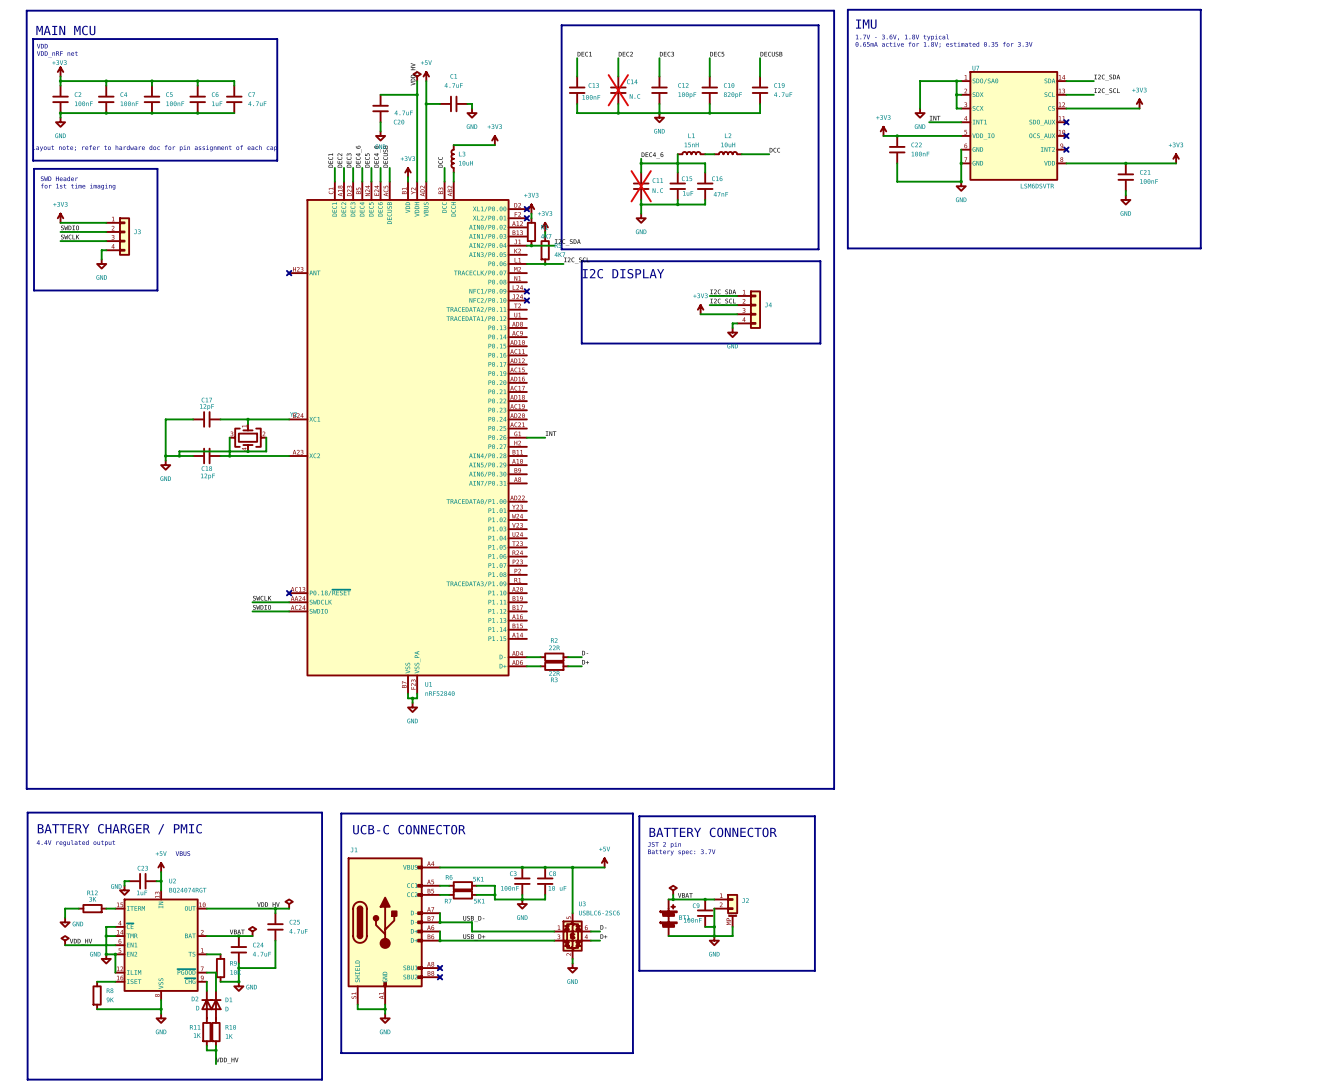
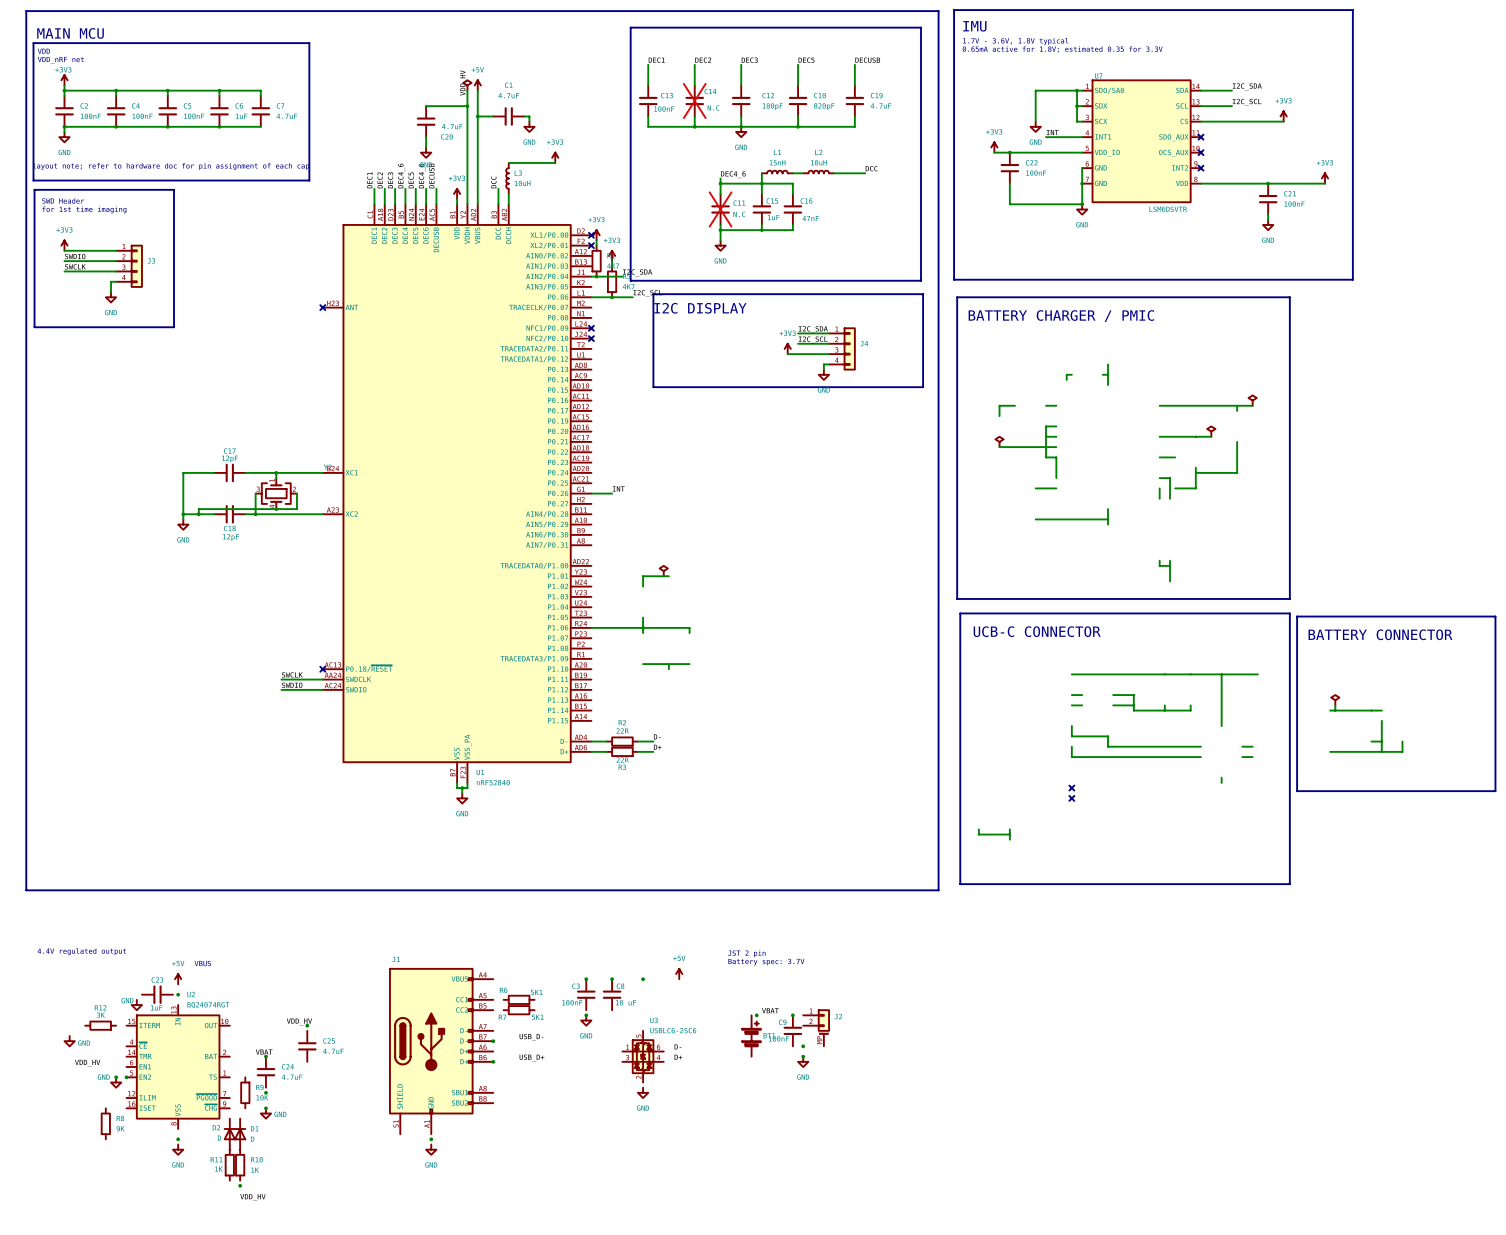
line: none -> (957, 297) (1289, 297) (1289, 598) (957, 598) (957, 297)
text: none -> BATTERY CHARGER / PMIC (1061, 316)
wire: none -> (1108, 364) (1108, 385)
wire: none -> (1071, 374) (1066, 374) (1066, 379)
wire: none -> (1102, 374) (1108, 374)
power symbol: none -> (1252, 400)
wire: none -> (1015, 405) (999, 405) (999, 416)
wire: none -> (1046, 405) (1056, 405)
wire: none -> (1159, 405) (1252, 405)
wire: none -> (1237, 405) (1237, 410)
wire: none -> (1056, 426) (1046, 426) (1046, 457) (1056, 457) (1056, 478)
power symbol: none -> (1211, 431)
wire: none -> (1046, 436) (1056, 436)
wire: none -> (1159, 436) (1211, 436)
power symbol: none -> (999, 441)
wire: none -> (1237, 441) (1237, 472) (1195, 472)
wire: none -> (999, 447) (1056, 447)
wire: none -> (1159, 457) (1175, 457)
wire: none -> (1195, 467) (1195, 488) (1175, 488)
wire: none -> (1159, 478) (1170, 478) (1170, 498)
wire: none -> (1035, 488) (1056, 488)
wire: none -> (1159, 488) (1159, 498)
wire: none -> (1108, 509) (1108, 524)
wire: none -> (1035, 519) (1108, 519)
wire: none -> (1159, 560) (1159, 565) (1170, 565)
wire: none -> (1170, 560) (1170, 581)
power symbol: none -> (663, 571)
wire: none -> (668, 576) (643, 576) (643, 586)
line: none -> (960, 613) (1289, 613) (1289, 884) (960, 884) (960, 613)
line: none -> (1297, 616) (1495, 616) (1495, 791) (1297, 791) (1297, 616)
wire: none -> (643, 617) (643, 633)
wire: none -> (591, 627) (689, 627) (689, 633)
text: none -> UCB-C CONNECTOR (1037, 631)
text: none -> BATTERY CONNECTOR (1380, 634)
wire: none -> (643, 664) (689, 664)
wire: none -> (668, 664) (668, 669)
wire: none -> (1071, 674) (1257, 674)
wire: none -> (1221, 674) (1221, 726)
wire: none -> (1071, 695) (1082, 695)
wire: none -> (1113, 695) (1133, 695) (1133, 710) (1190, 710) (1190, 705)
power symbol: none -> (1335, 700)
wire: none -> (1071, 705) (1082, 705)
wire: none -> (1113, 705) (1133, 705)
wire: none -> (1164, 705) (1164, 710)
wire: none -> (1335, 705) (1335, 710)
wire: none -> (1330, 710) (1381, 710)
wire: none -> (1381, 720) (1381, 751)
wire: none -> (1071, 726) (1071, 736) (1108, 736) (1108, 746) (1201, 746)
wire: none -> (1371, 741) (1381, 741)
wire: none -> (1402, 741) (1402, 751) (1330, 751)
wire: none -> (1071, 746) (1071, 757) (1201, 757)
wire: none -> (1242, 746) (1252, 746)
wire: none -> (1242, 757) (1252, 757)
wire: none -> (1221, 777) (1221, 782)
no-connect mark: none -> (1071, 788)
no-connect mark: none -> (1071, 798)
wire: none -> (978, 829) (978, 834) (1009, 834)
wire: none -> (1009, 829) (1009, 839)
line: (27, 812) (322, 812) (322, 1079) (27, 1079) (27, 812) -> none
line: (341, 813) (632, 813) (632, 1053) (341, 1053) (341, 813) -> none
line: (639, 816) (814, 816) (814, 970) (639, 970) (639, 816) -> none
text: BATTERY CHARGER / PMIC (119, 829) -> none
text: UCB-C CONNECTOR (409, 829) -> none
text: BATTERY CONNECTOR (713, 832) -> none
wire: (440, 867) (604, 867) -> none
wire: (572, 867) (572, 913) -> none
wire: (161, 872) (161, 890) -> none
wire: (129, 881) (124, 881) (124, 885) -> none
wire: (156, 881) (161, 881) -> none
wire: (440, 885) (449, 885) -> none
wire: (476, 885) (494, 885) (494, 899) (545, 899) (545, 894) -> none
power symbol: (673, 890) -> none
wire: (440, 894) (449, 894) -> none
wire: (476, 894) (494, 894) -> none
wire: (522, 894) (522, 899) -> none
wire: (673, 894) (673, 899) -> none
wire: (668, 899) (714, 899) -> none
power symbol: (289, 904) -> none
wire: (78, 908) (65, 908) (65, 917) -> none
wire: (106, 908) (115, 908) -> none
wire: (206, 908) (289, 908) -> none
wire: (275, 908) (275, 913) -> none
wire: (714, 908) (714, 936) -> none
wire: (440, 913) (440, 922) (472, 922) (472, 931) (554, 931) -> none
wire: (115, 926) (106, 926) (106, 954) (115, 954) (115, 972) -> none
wire: (705, 926) (714, 926) -> none
wire: (732, 926) (732, 936) (668, 936) -> none
power symbol: (252, 931) -> none
wire: (440, 931) (440, 940) (554, 940) -> none
wire: (590, 931) (600, 931) -> none
wire: (106, 936) (115, 936) -> none
wire: (206, 936) (252, 936) -> none
power symbol: (65, 940) -> none
wire: (275, 940) (275, 968) (238, 968) -> none
wire: (590, 940) (600, 940) -> none
wire: (65, 945) (115, 945) -> none
wire: (206, 954) (220, 954) -> none
wire: (572, 958) (572, 963) -> none
wire: (238, 963) (238, 981) (220, 981) -> none
no-connect mark: (440, 968) -> none
wire: (206, 972) (215, 972) (215, 990) -> none
no-connect mark: (440, 977) -> none
wire: (97, 981) (115, 981) -> none
wire: (206, 981) (206, 990) -> none
wire: (161, 1000) (161, 1013) -> none
wire: (357, 1004) (357, 1009) (385, 1009) -> none
wire: (385, 1004) (385, 1013) -> none
wire: (97, 1009) (161, 1009) -> none
wire: (206, 1045) (206, 1050) (215, 1050) -> none
wire: (215, 1045) (215, 1064) -> none

